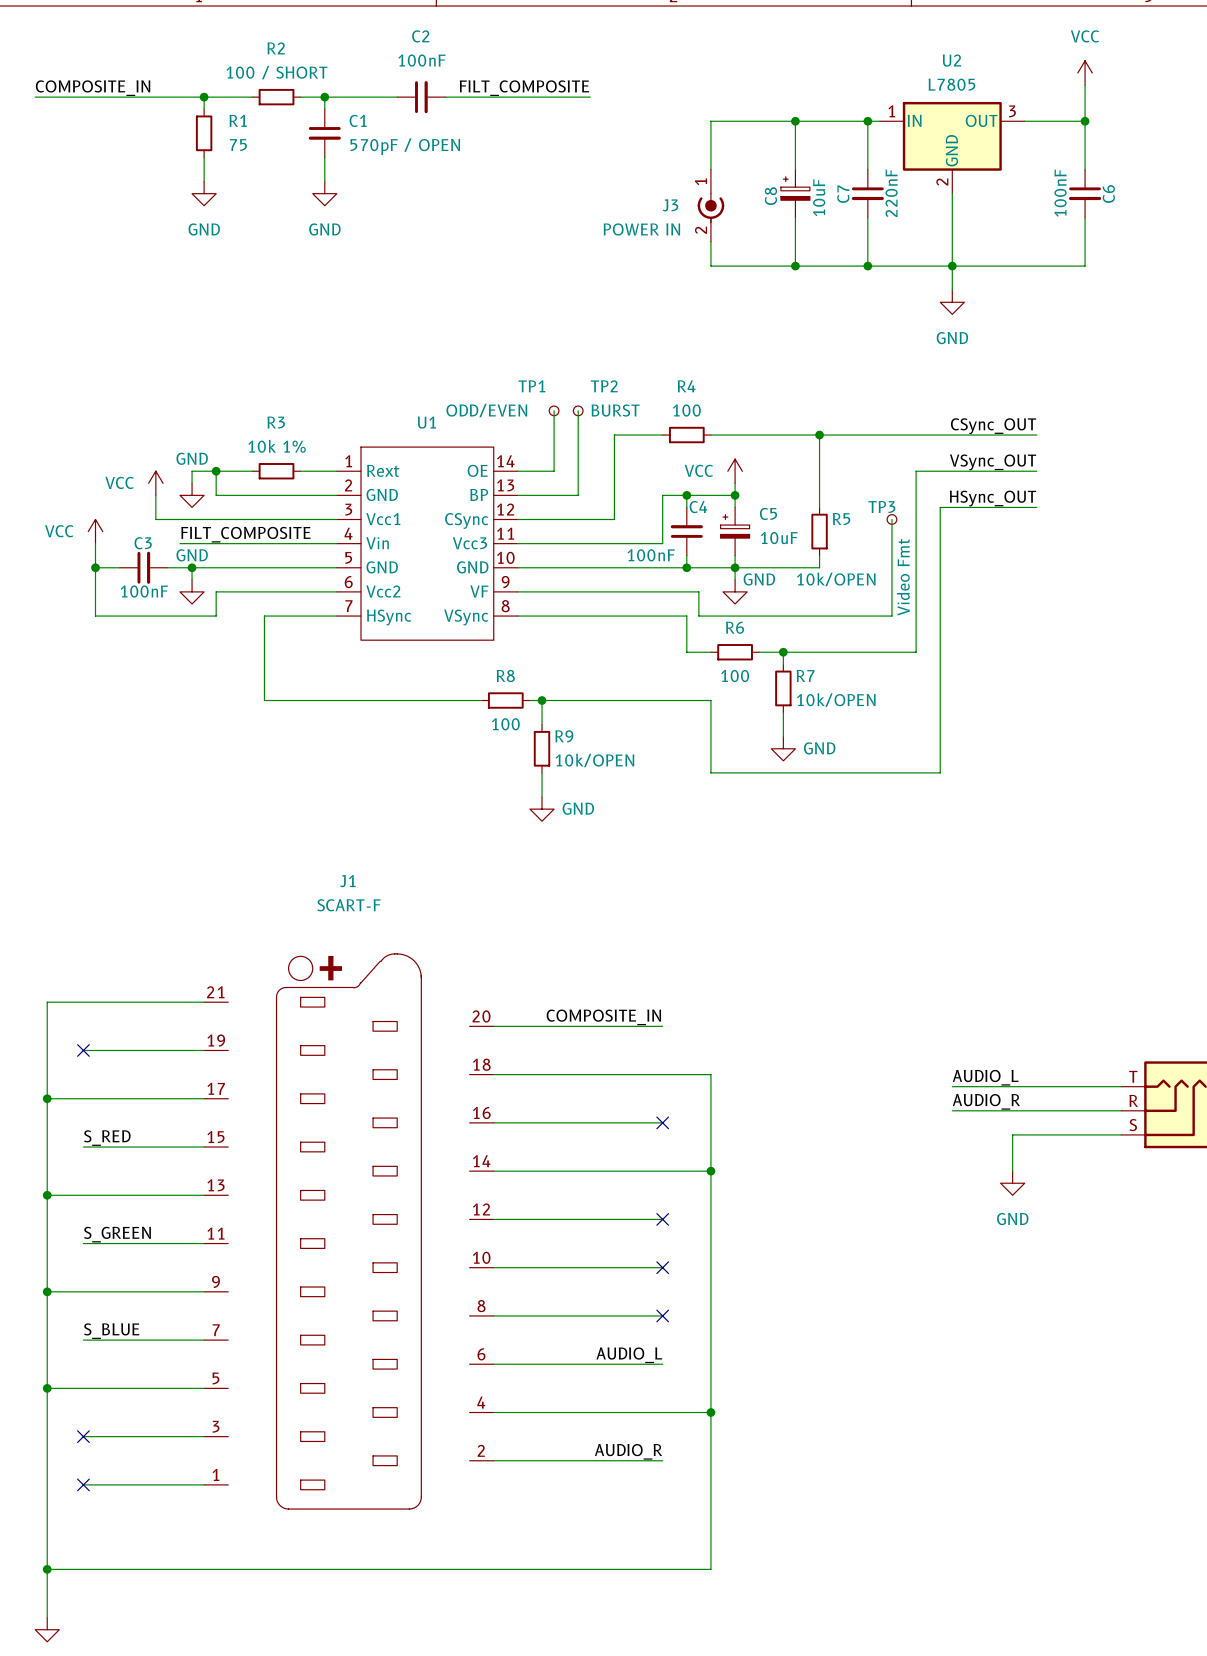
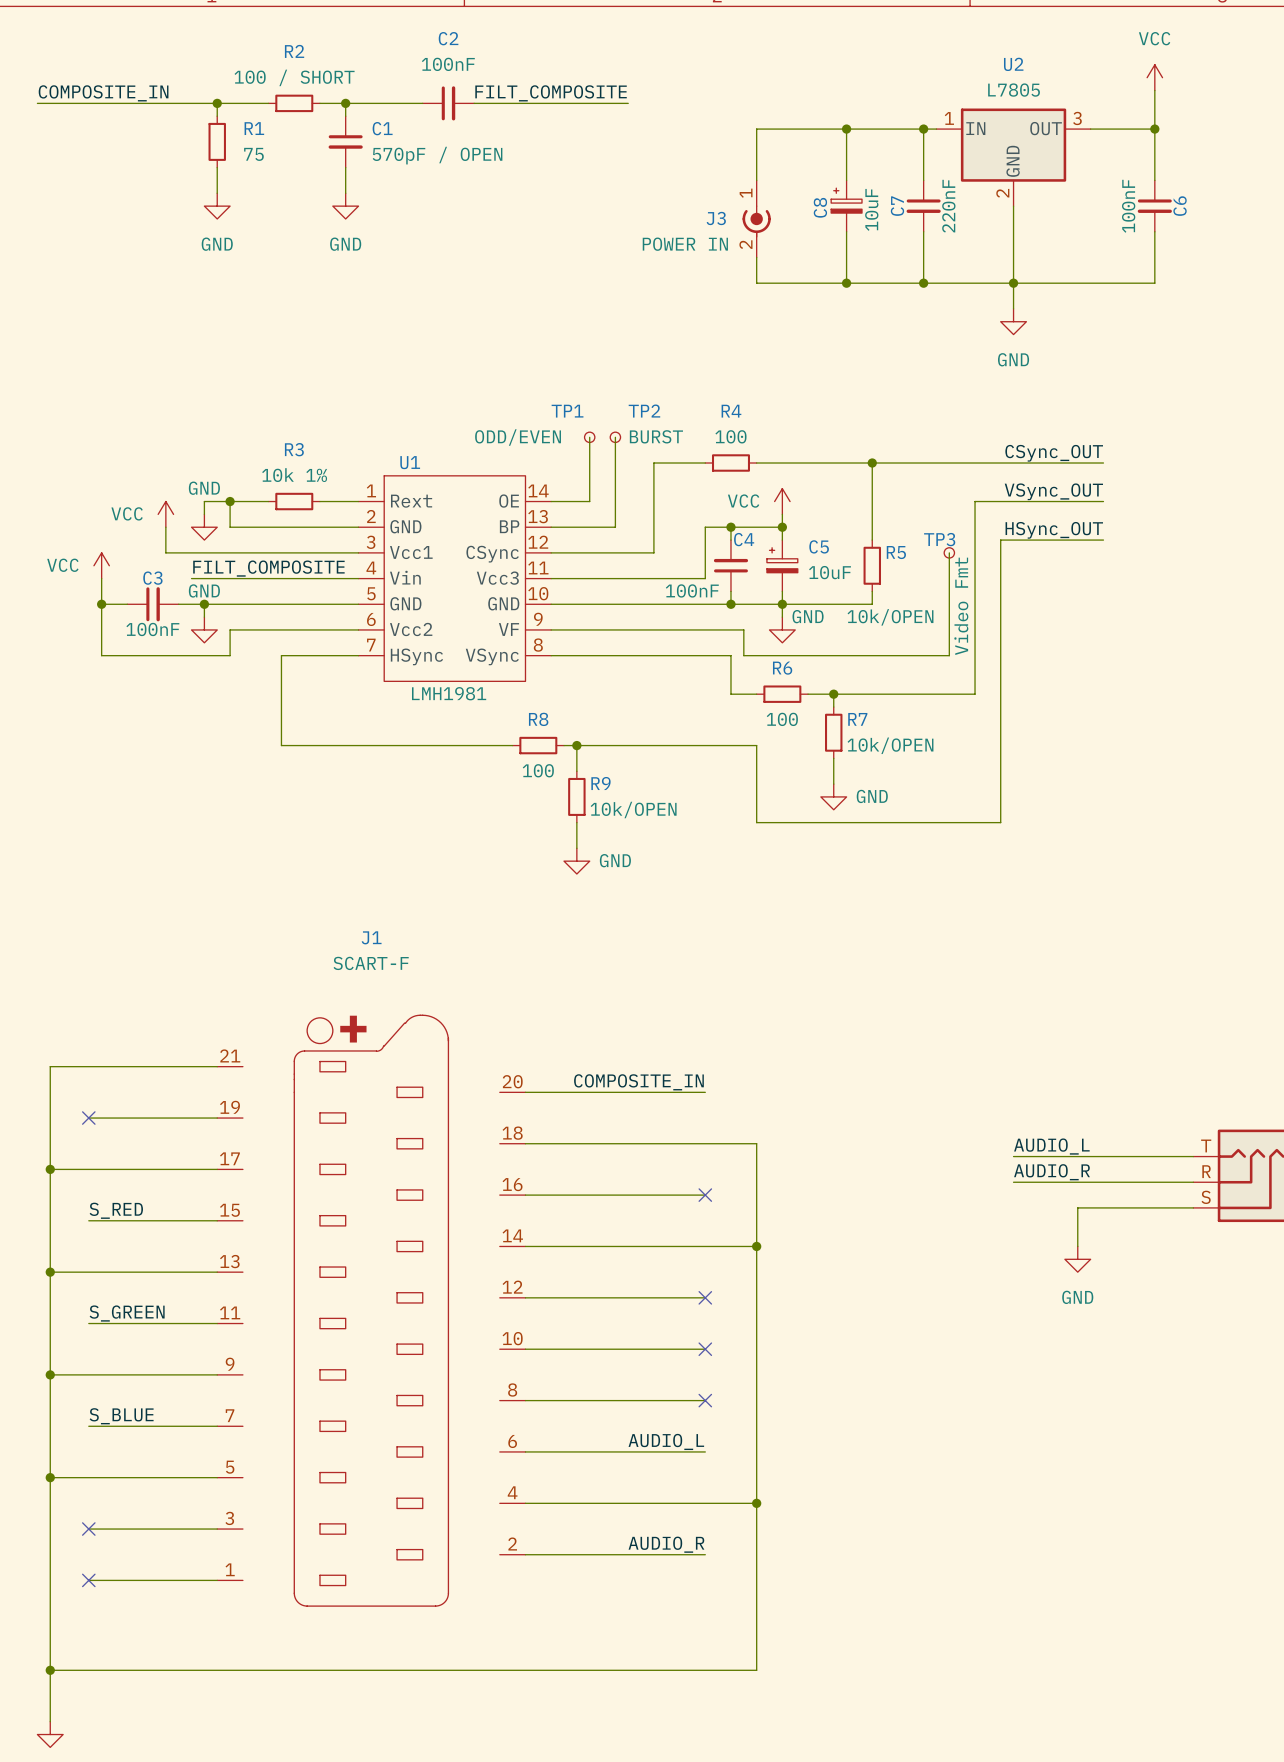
U1 name position: U1 (426, 422) -> U1 (410, 462)
U1 value: none -> LMH1981 (449, 693)

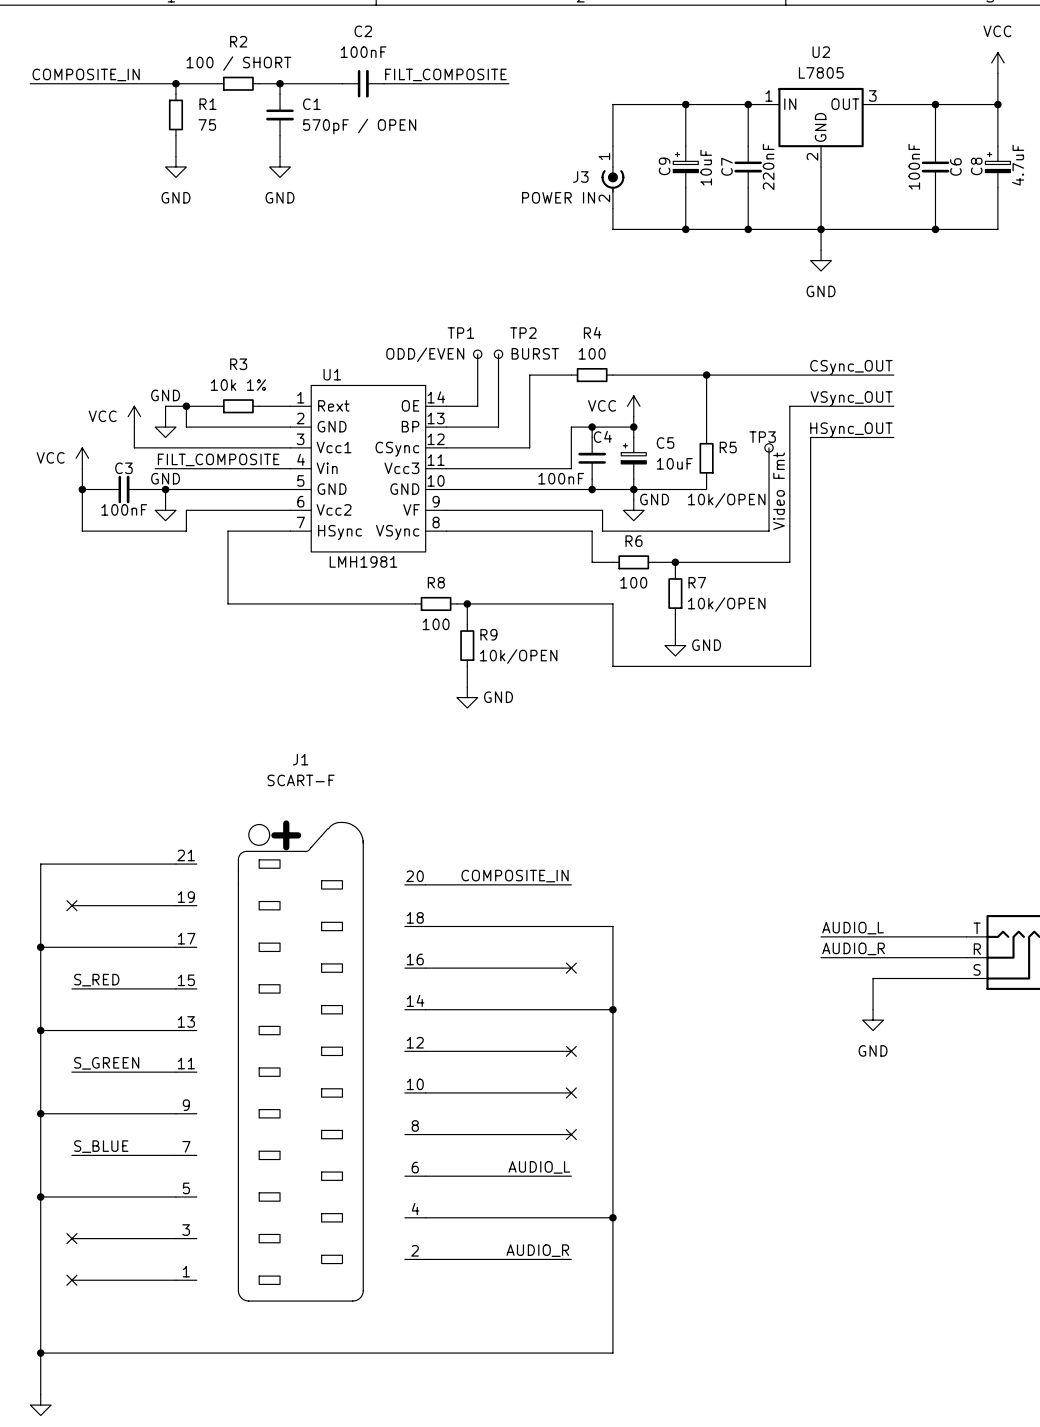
power symbol position: VCC (1154, 77) -> VCC (997, 62)
wire: (1154, 90) (1154, 129) -> (997, 104) (935, 104)
wire: none -> (997, 73) (997, 146)
junction: none -> (997, 104)
C8: none -> 4.7uF (997, 166)
C8 name: C8 (820, 207) -> C9 (664, 166)
wire: none -> (997, 187) (997, 229) (935, 229)
junction: none -> (935, 229)

